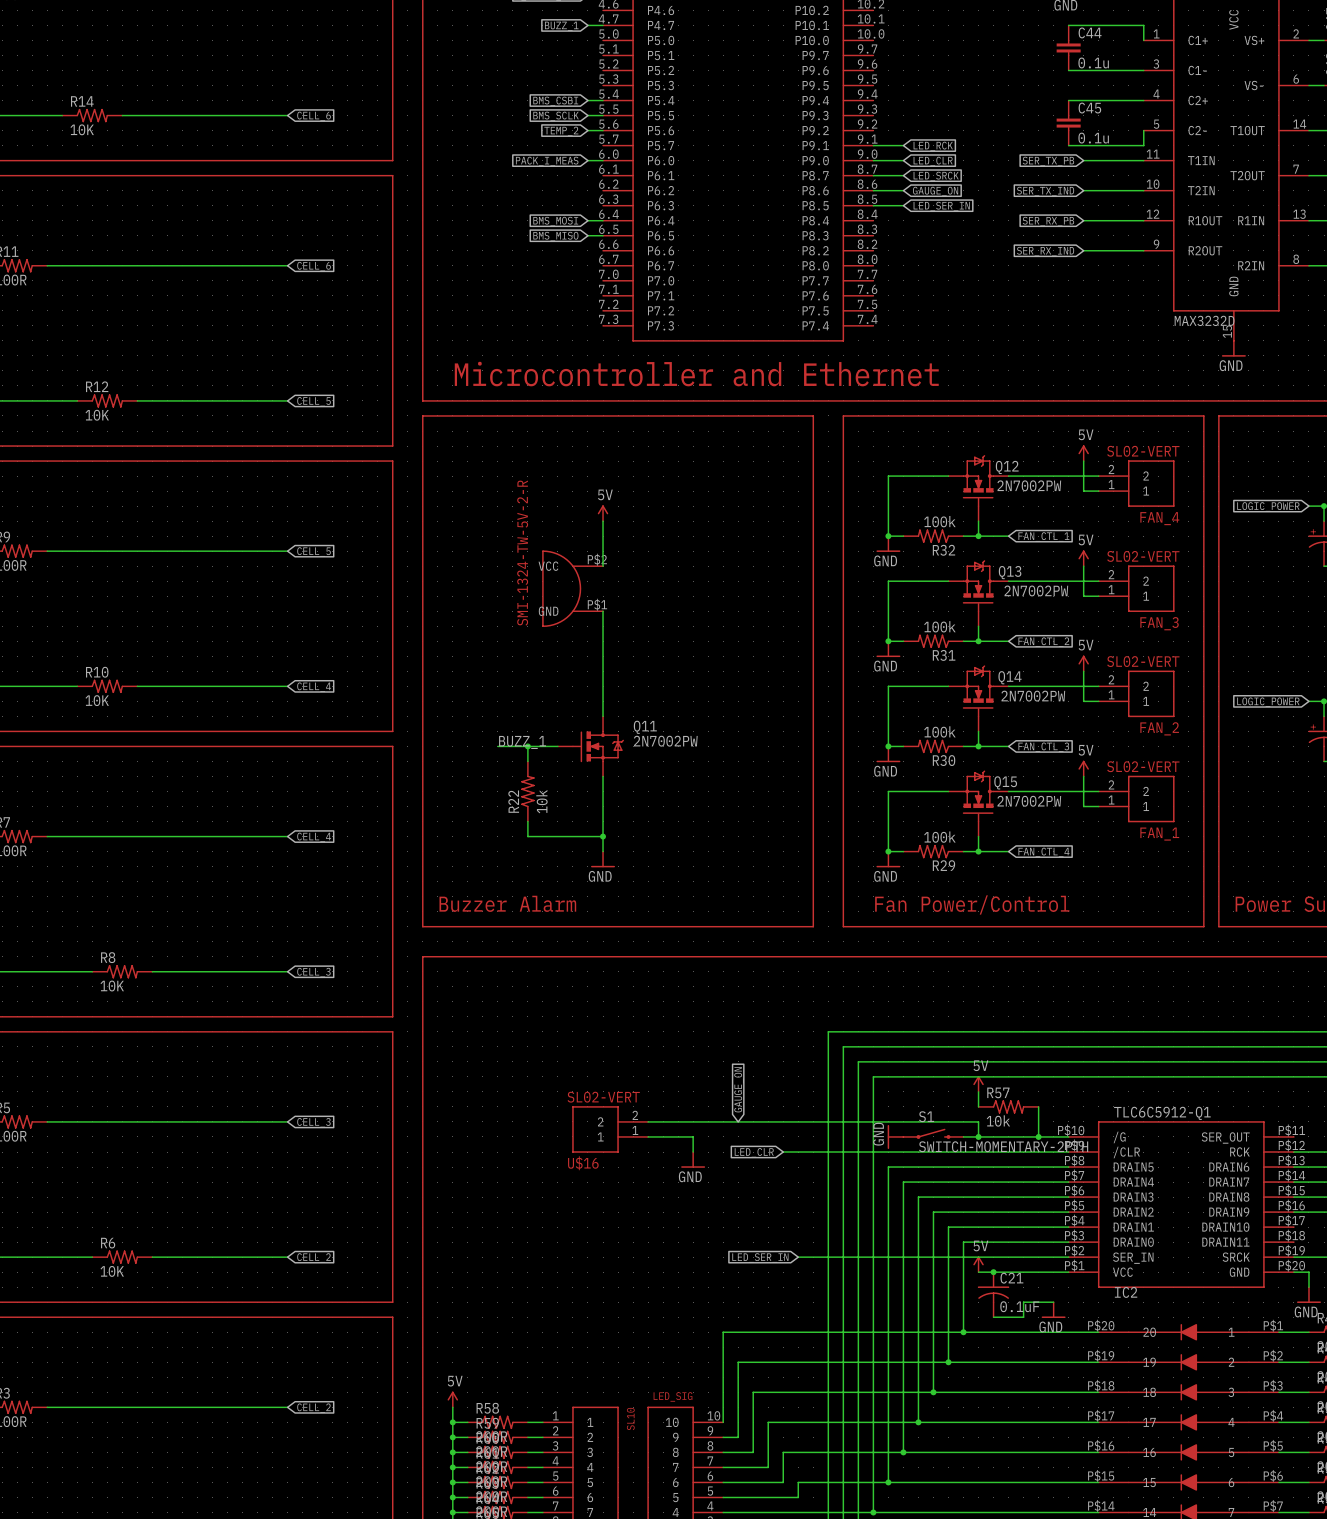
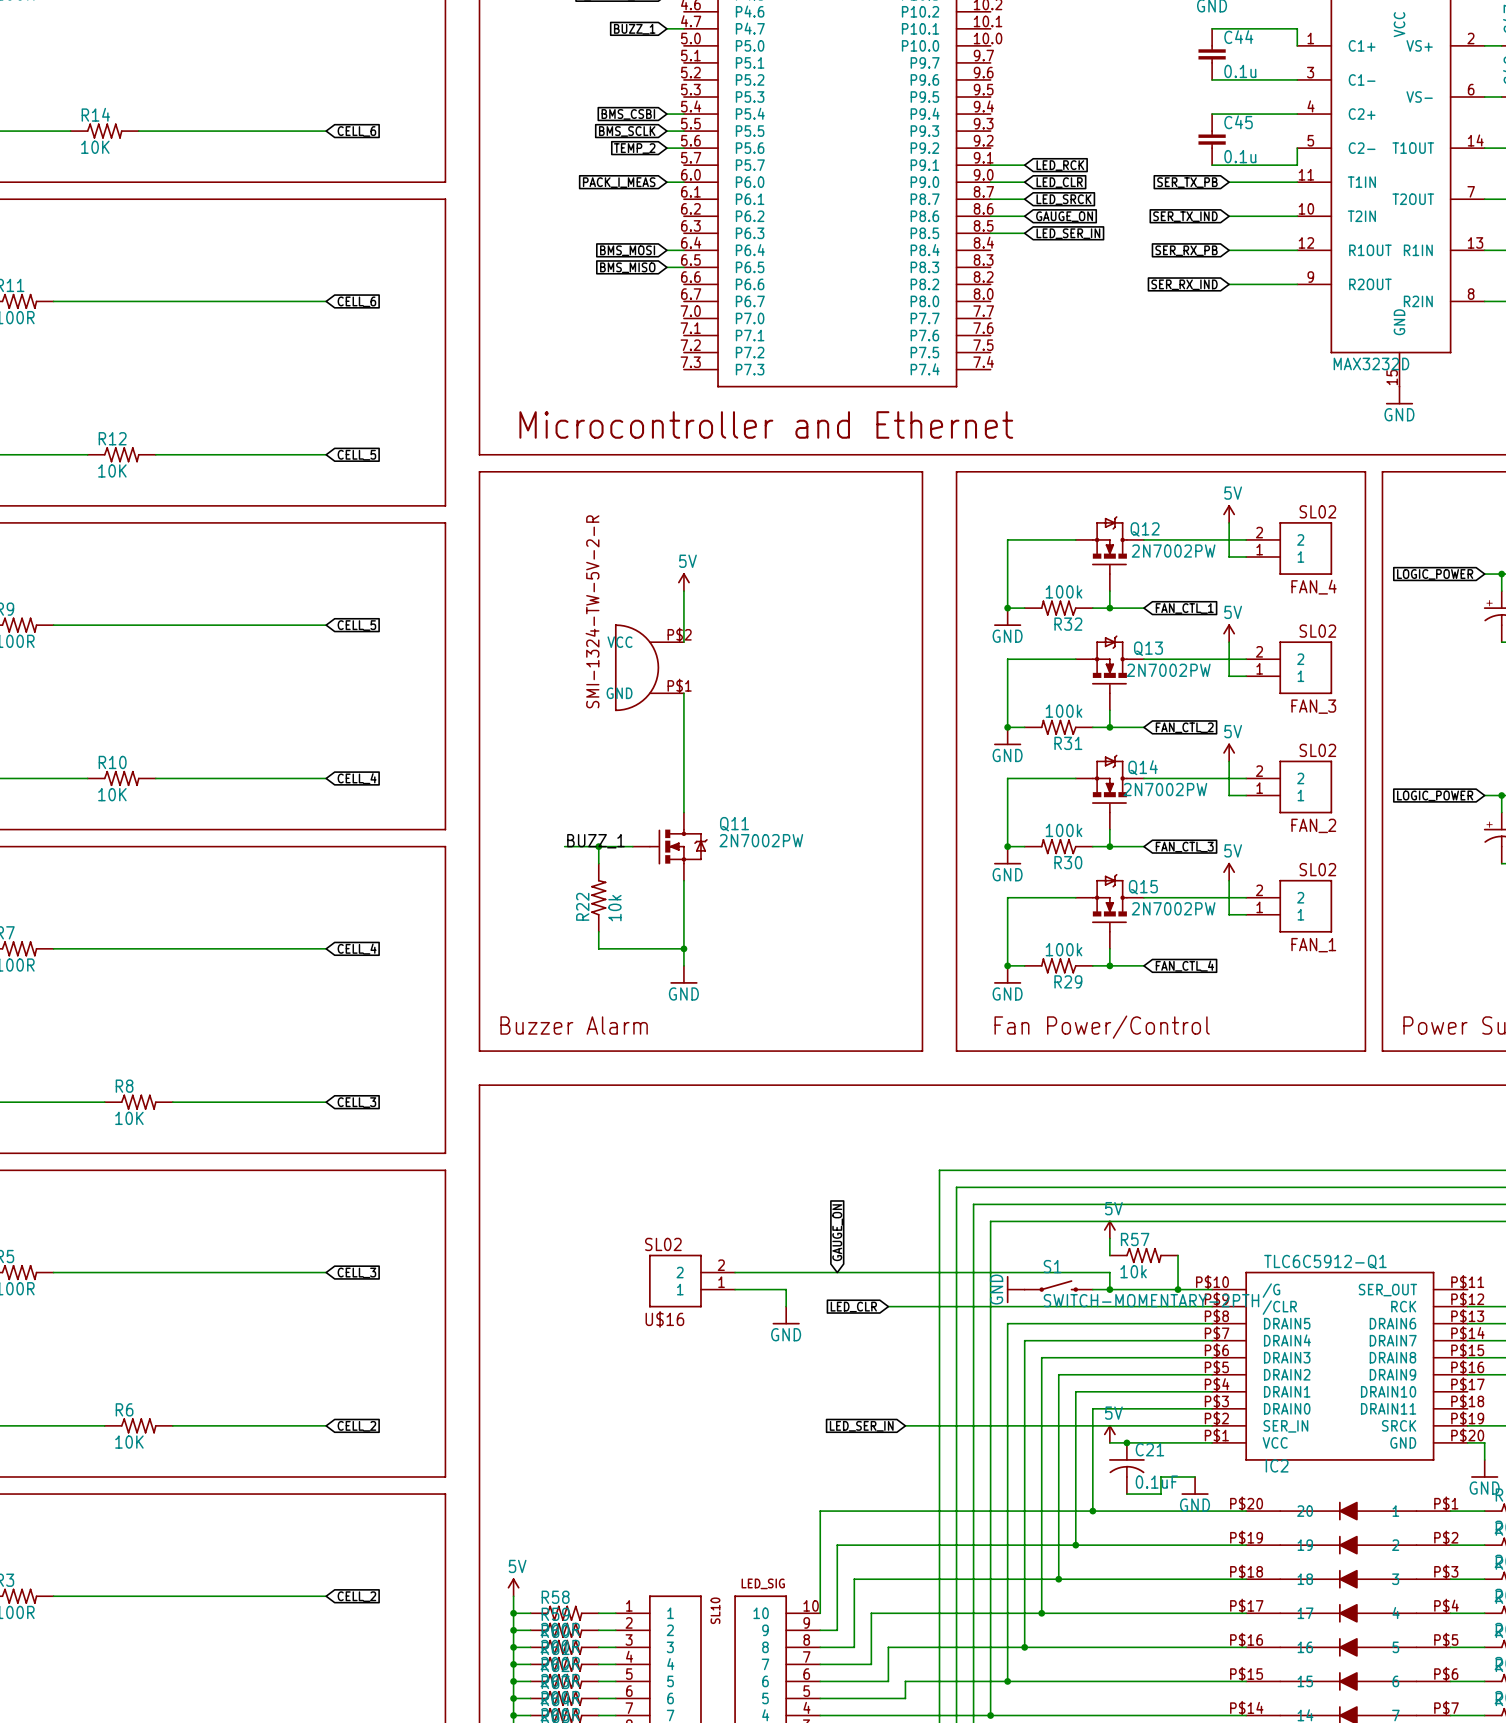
FAN_4 value: SL02-VERT (1143, 451) -> SL02 (1317, 511)
FAN_3 value: SL02-VERT (1143, 556) -> SL02 (1317, 631)
FAN_2 value: SL02-VERT (1143, 661) -> SL02 (1317, 750)
FAN_1 value: SL02-VERT (1143, 766) -> SL02 (1317, 869)
U$16 value: SL02-VERT (603, 1097) -> SL02 (663, 1244)

